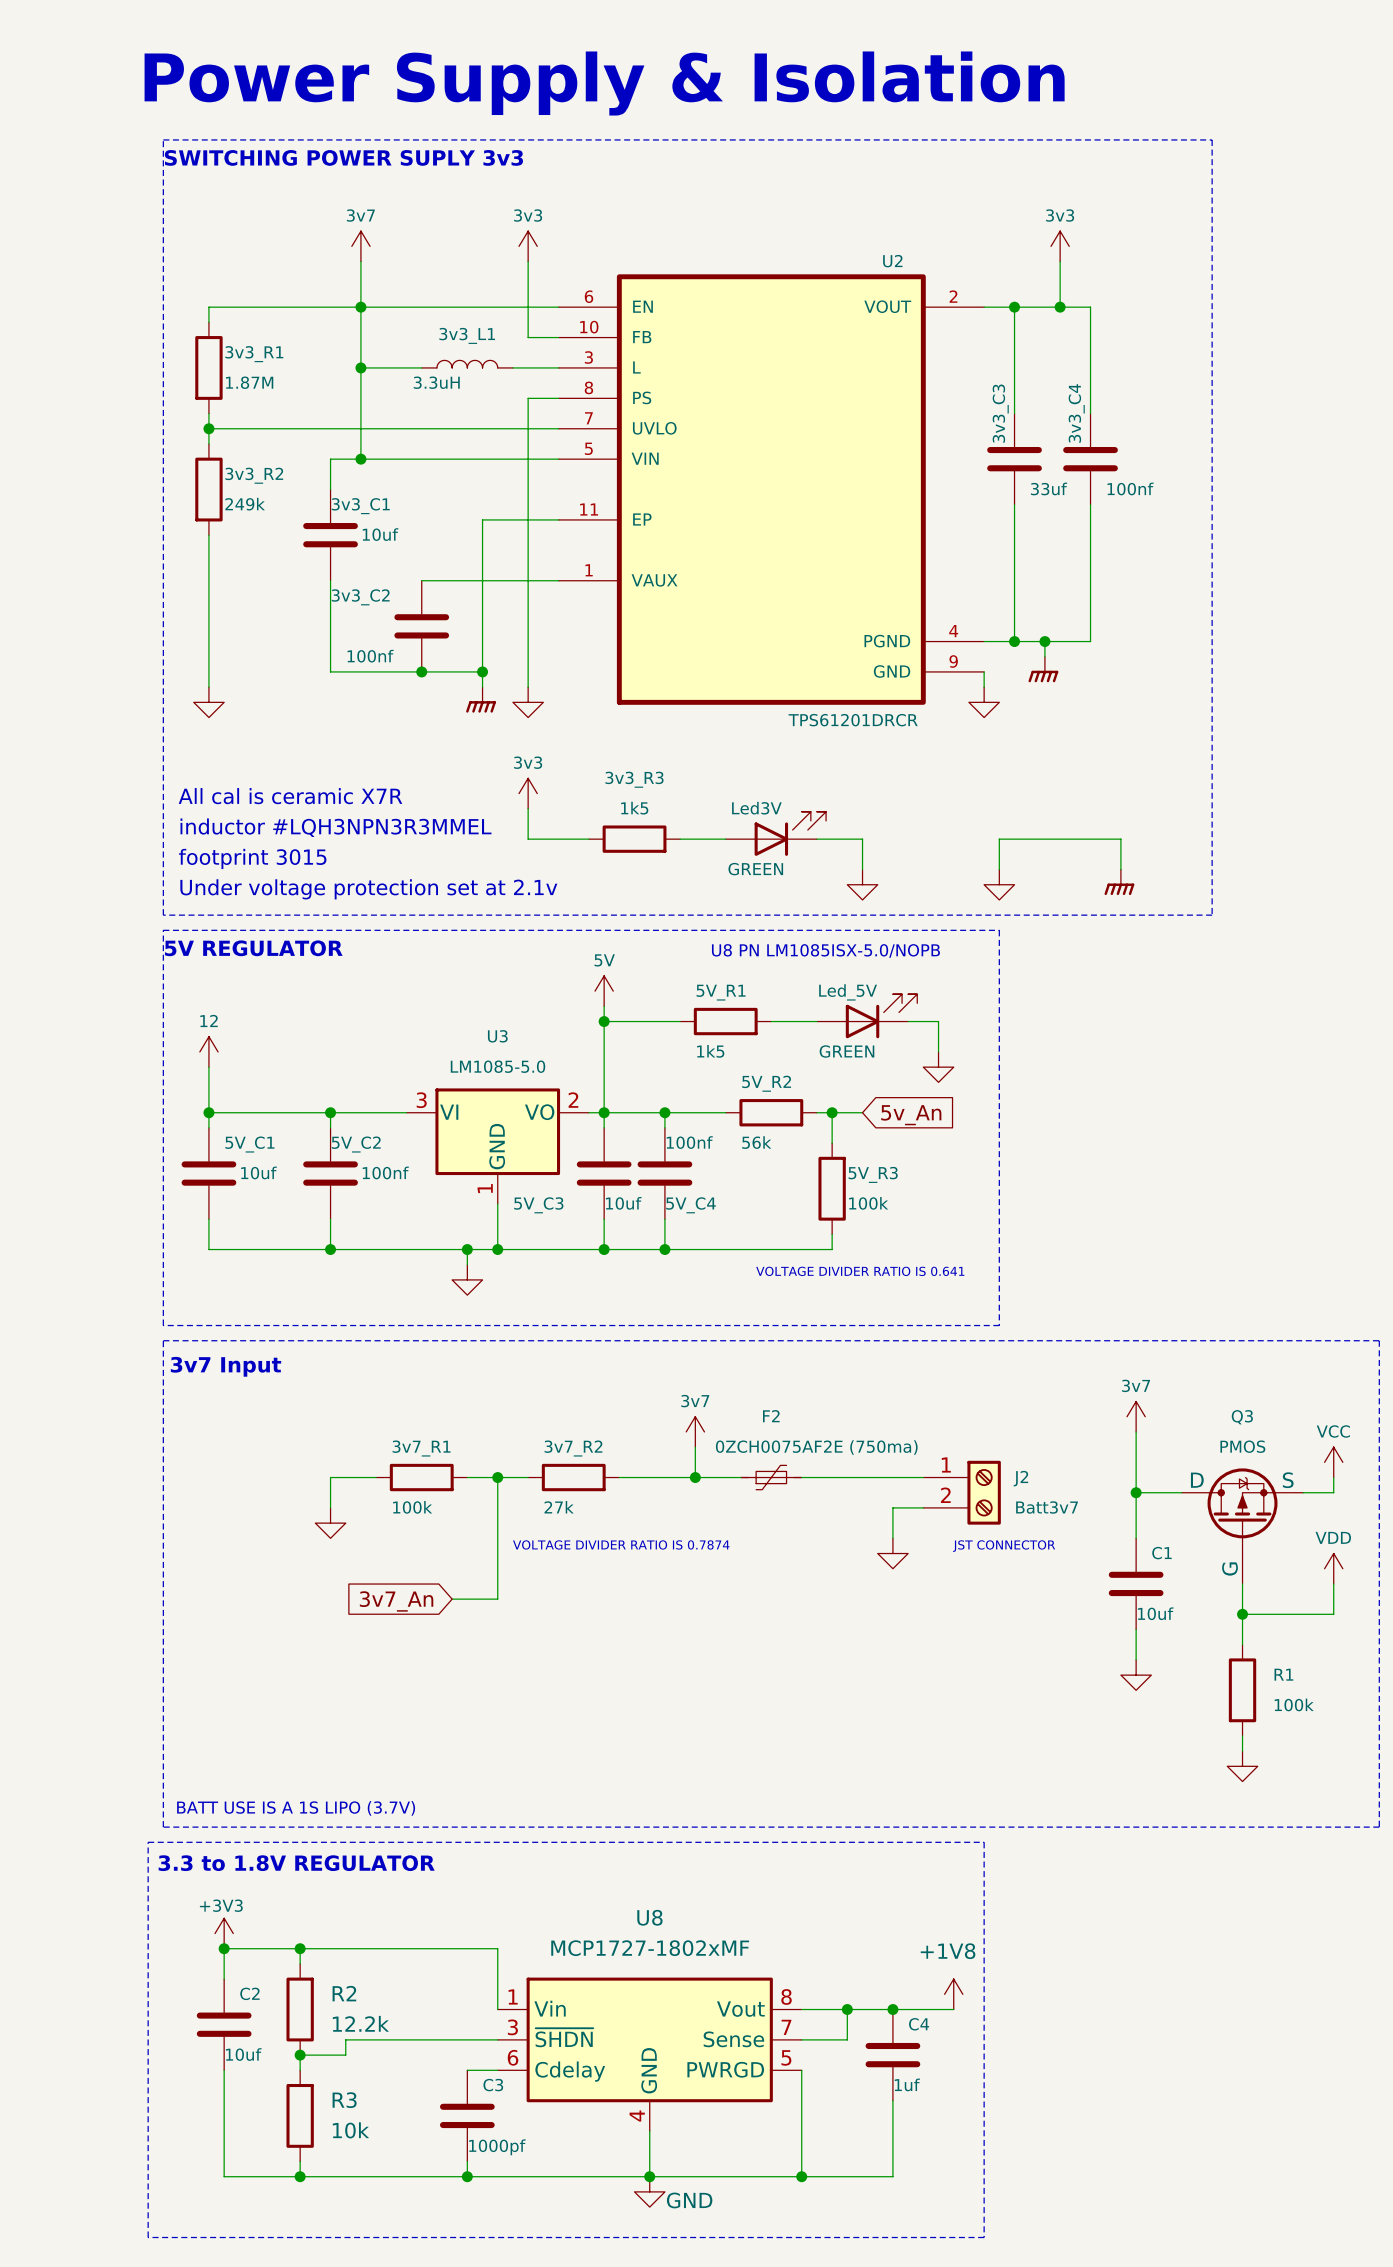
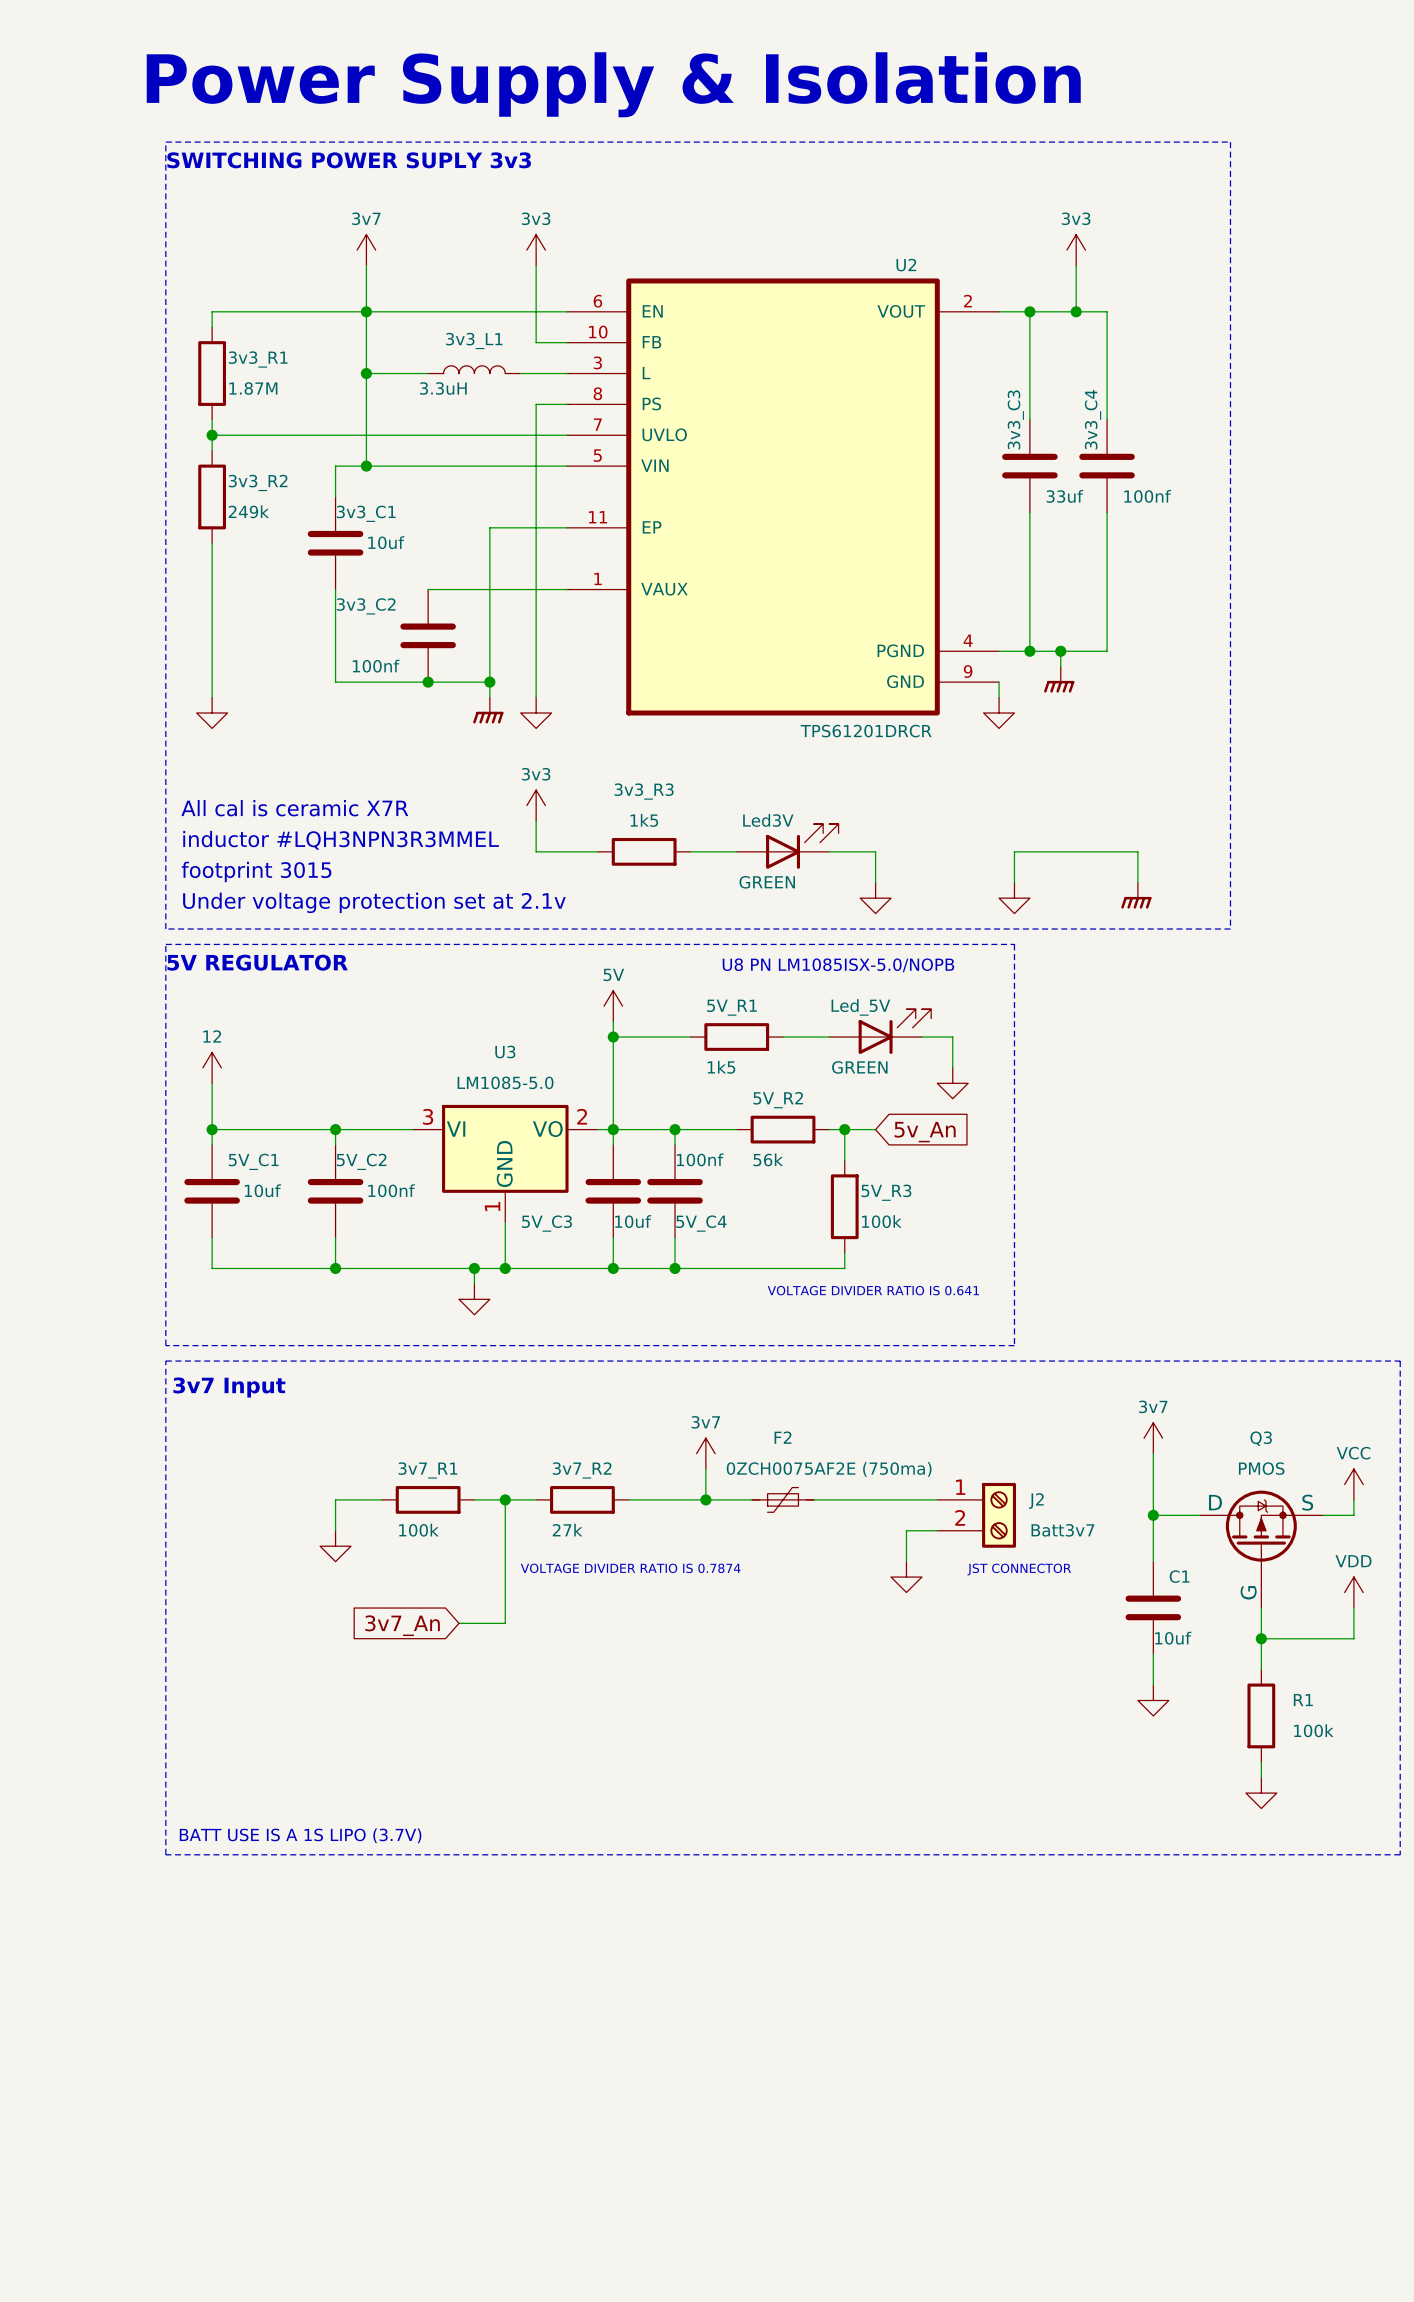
line: (148, 1842) (984, 1842) (984, 2237) (148, 2237) (148, 1842) -> none
text: 3.3 to 1.8V REGULATOR (296, 1863) -> none
power symbol: +3V3 (224, 1933) -> none
junction: (224, 1948) -> none
wire: (300, 1948) (300, 1963) -> none
junction: (300, 1948) -> none
wire: (224, 1979) (224, 1948) (497, 1948) (497, 2009) -> none
power symbol: +1V8 (953, 1994) -> none
R2: 12.2k (300, 2009) -> none
wire: (801, 2009) (953, 2009) -> none
wire: (847, 2009) (847, 2039) (801, 2039) -> none
junction: (847, 2009) -> none
junction: (892, 2009) -> none
C2: 10uf (224, 2024) -> none
wire: (497, 2039) (345, 2039) (345, 2055) (300, 2055) (300, 2070) -> none
U8: MCP1727-1802xMF (649, 2054) -> none
junction: (300, 2055) -> none
C4: 1uf (892, 2055) -> none
wire: (224, 2070) (224, 2176) (892, 2176) (892, 2100) -> none
wire: (467, 2070) (497, 2070) -> none
wire: (801, 2070) (801, 2176) -> none
R3: 10k (300, 2115) -> none
C3: 1000pf (467, 2115) -> none
wire: (649, 2131) (649, 2176) -> none
wire: (300, 2161) (300, 2176) -> none
wire: (467, 2161) (467, 2176) -> none
junction: (300, 2176) -> none
junction: (467, 2176) -> none
junction: (649, 2176) -> none
junction: (801, 2176) -> none
power symbol: GND (649, 2191) -> none

